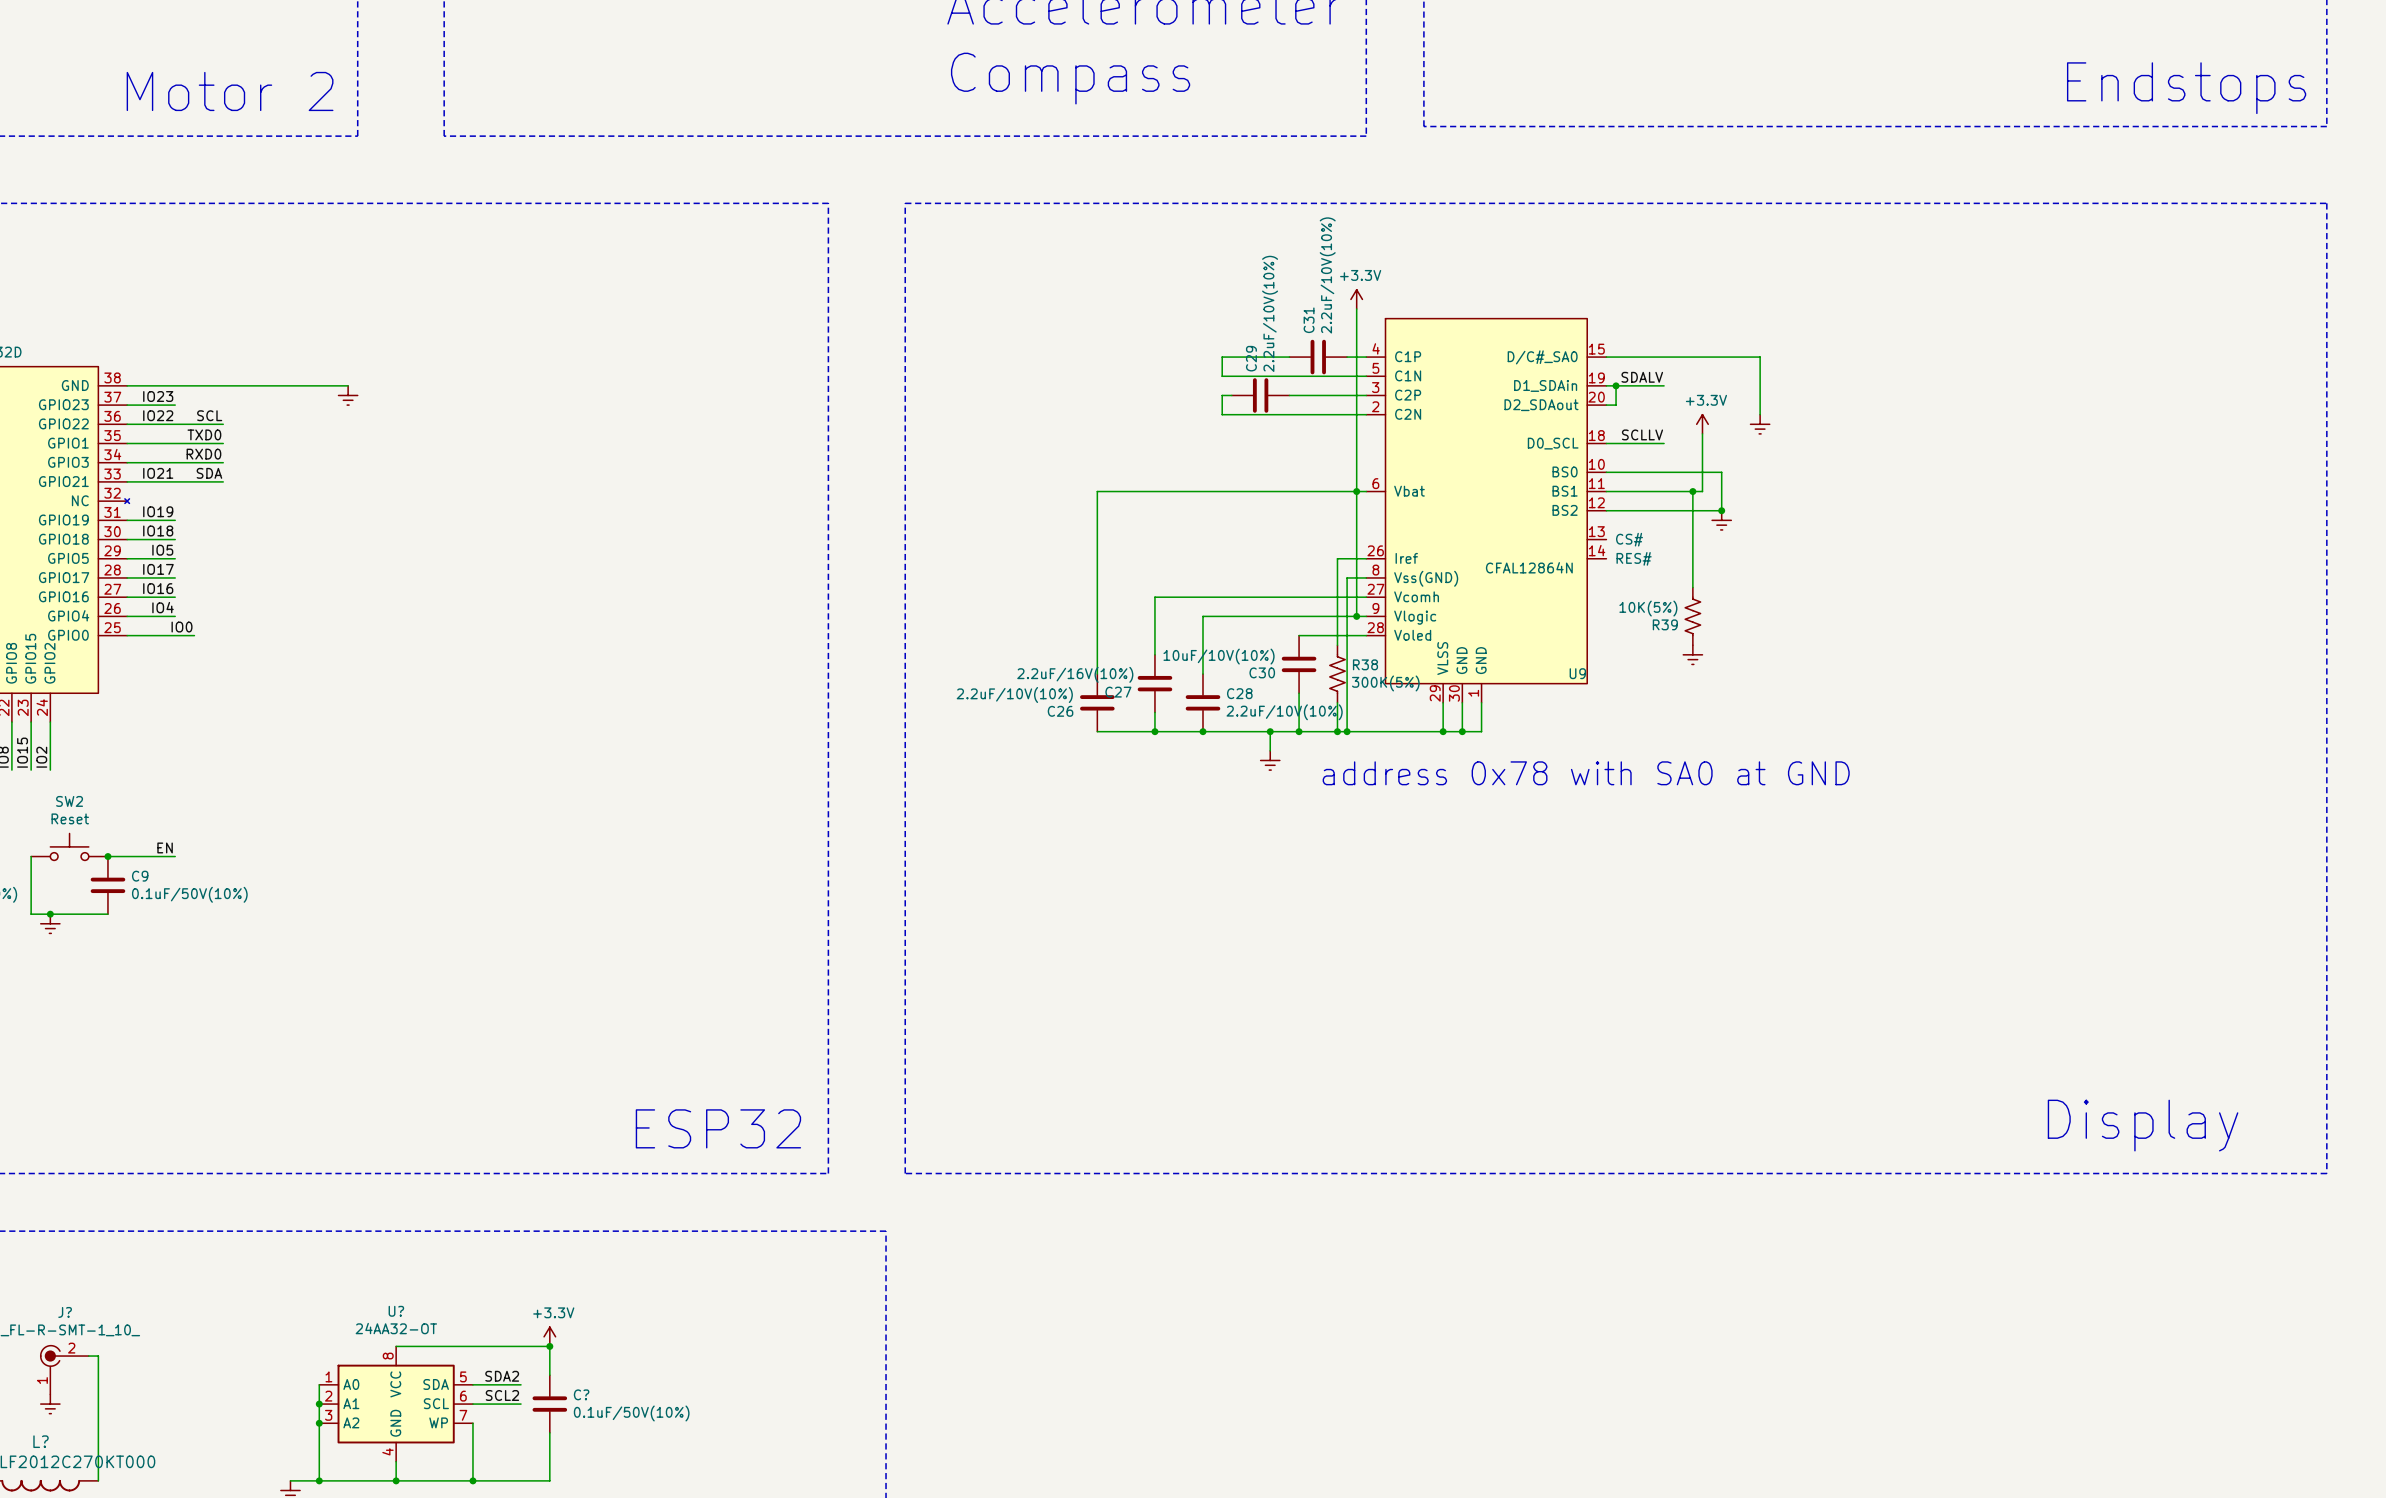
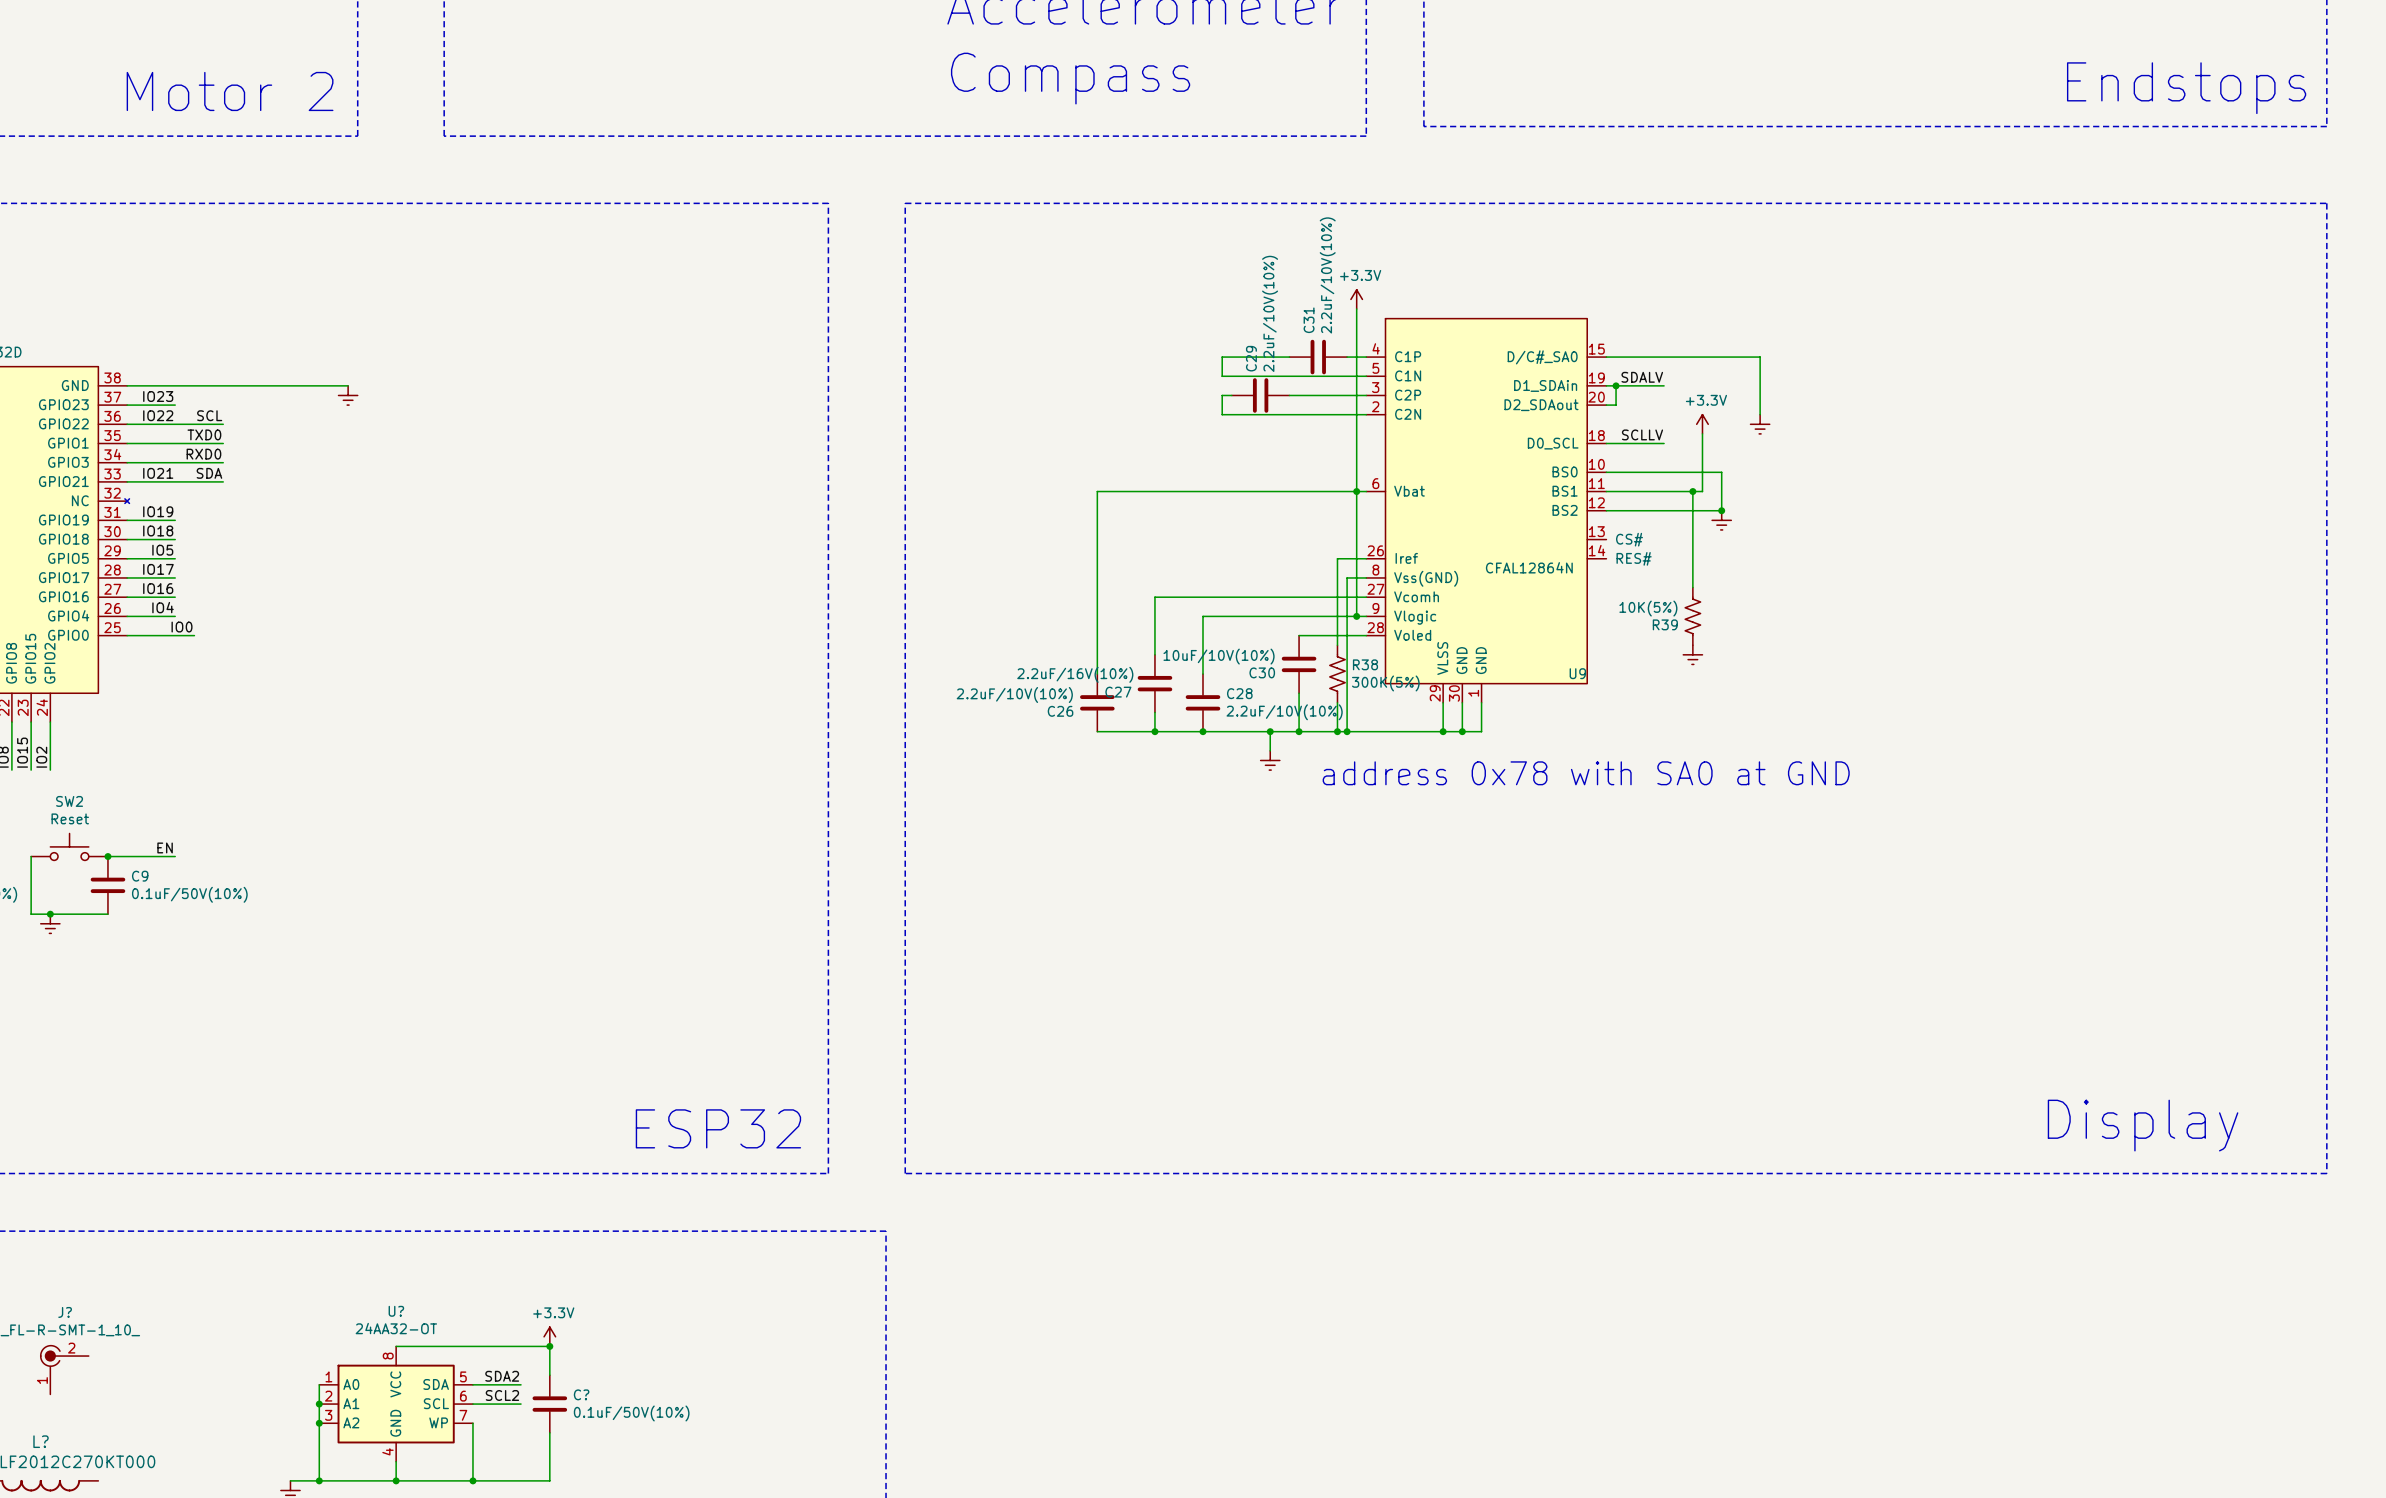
wire: (88, 1356) (98, 1356) (98, 1480) -> none
power symbol: (50, 1404) -> none

